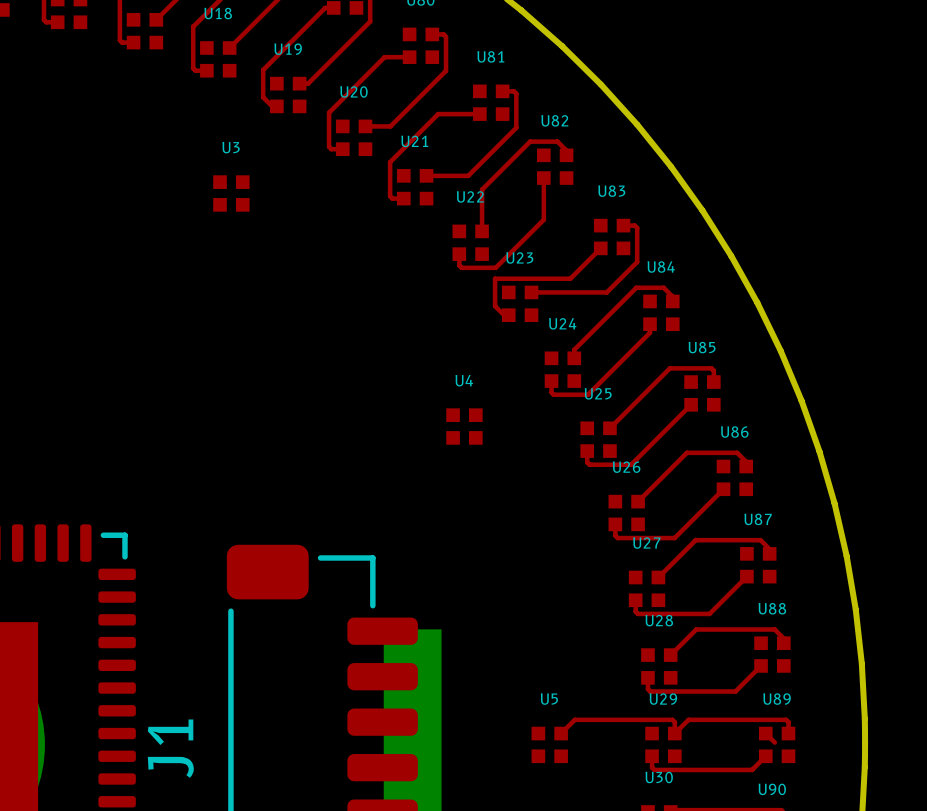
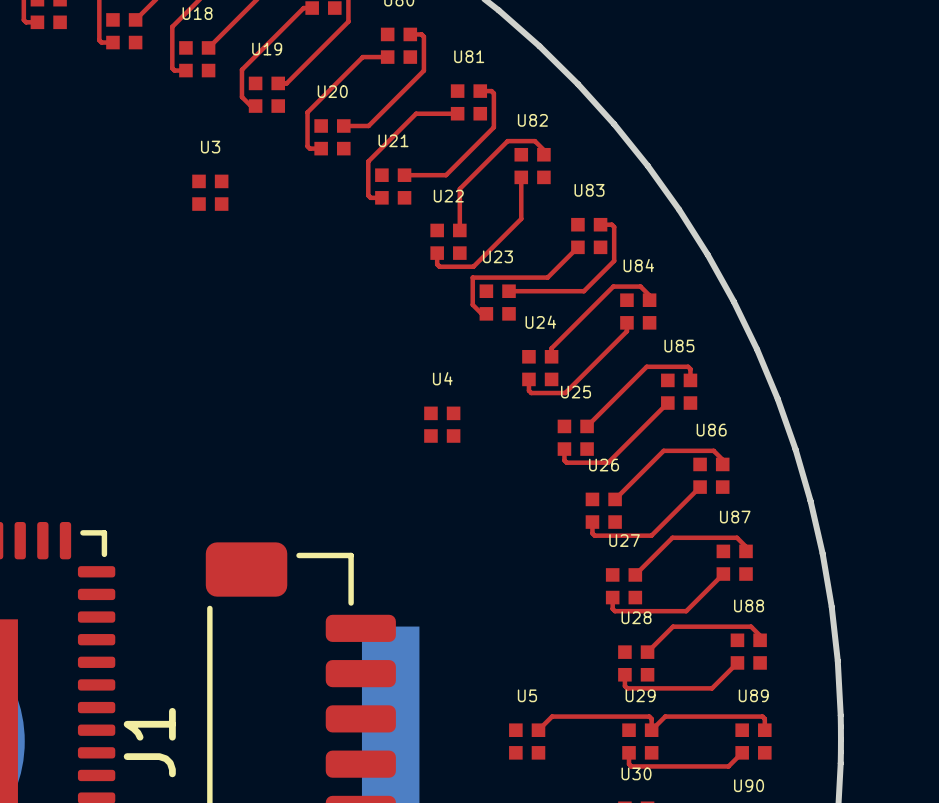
top track: (765, 733) (774, 742) -> none

